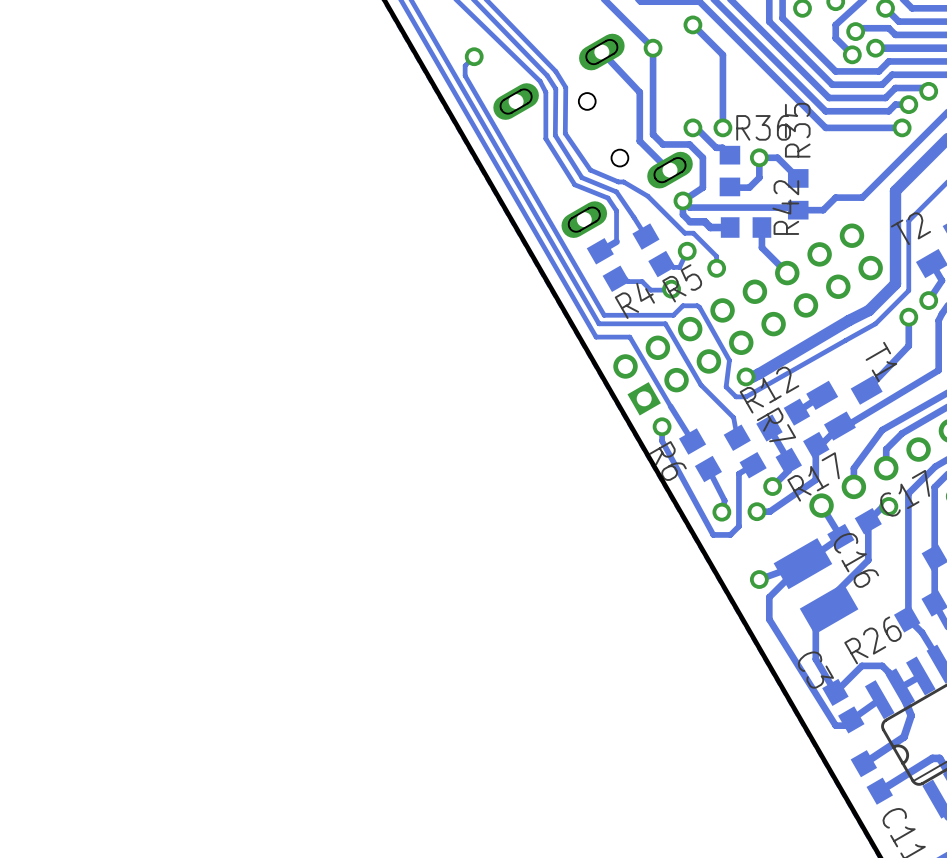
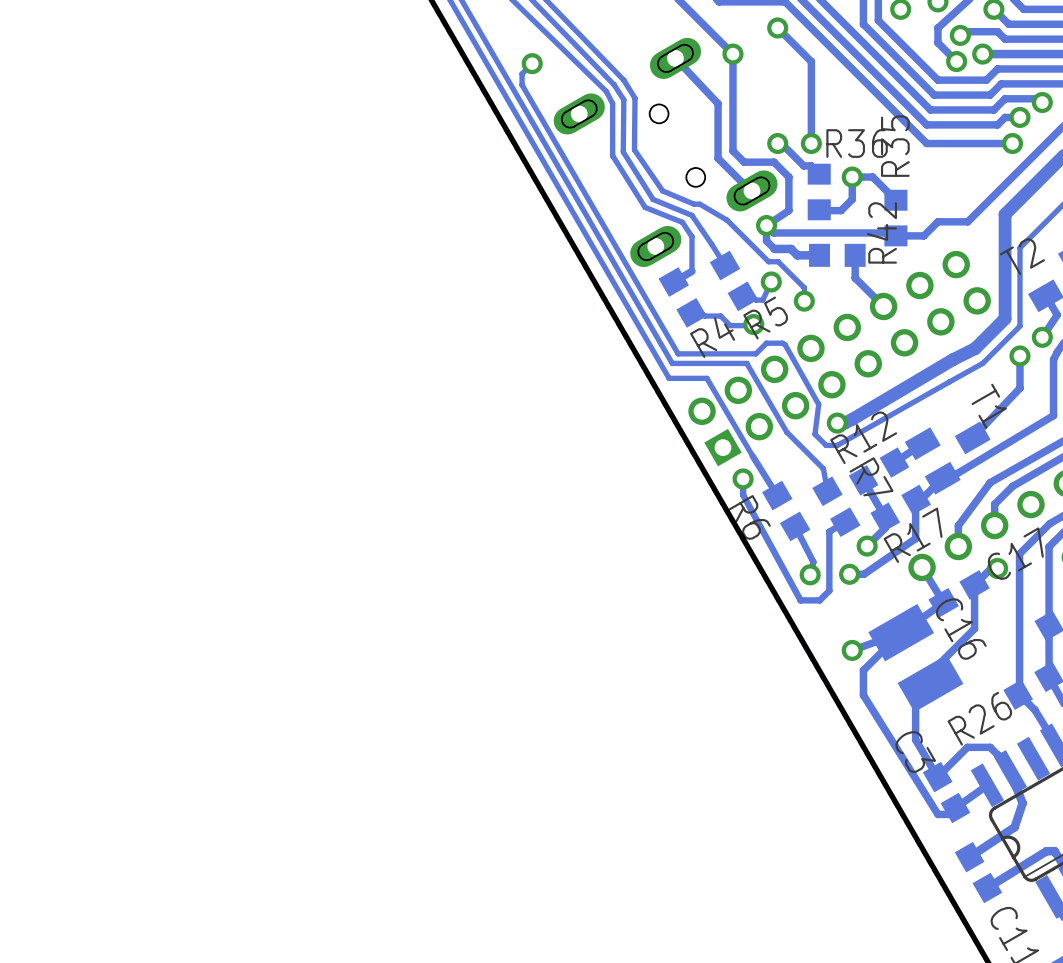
track: (920, 675) (900, 687) -> none

